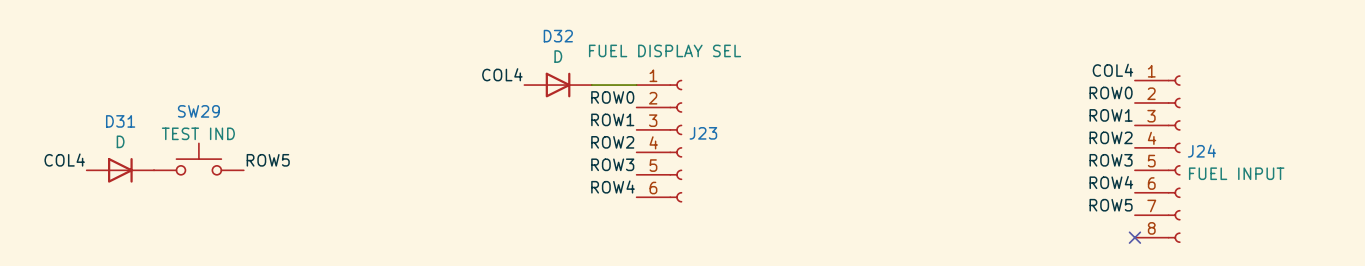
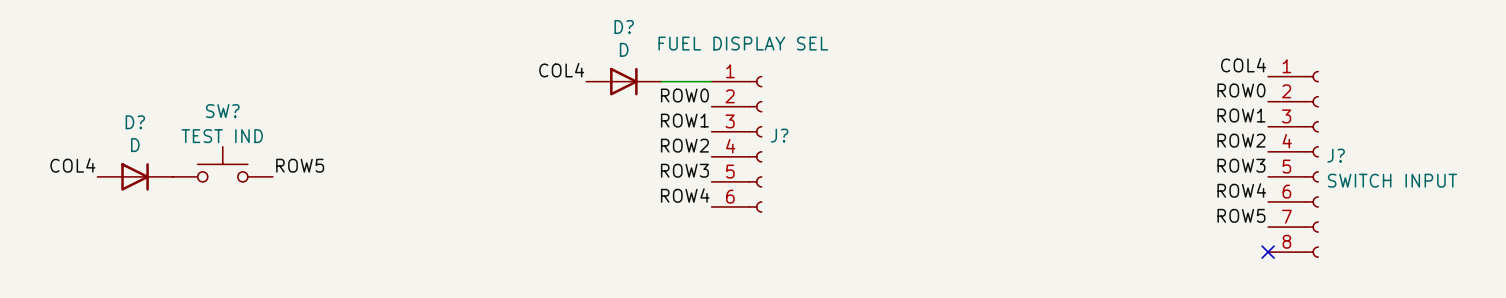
D32 name: D32 (558, 36) -> D? (624, 27)
SW29 name: SW29 (198, 111) -> SW? (222, 111)
D31 name: D31 (120, 121) -> D? (135, 122)
J23 name: J23 (703, 133) -> J? (779, 135)
J24 name: J24 (1201, 151) -> J? (1336, 155)
J24 value: FUEL INPUT (1236, 173) -> SWITCH INPUT (1392, 180)

